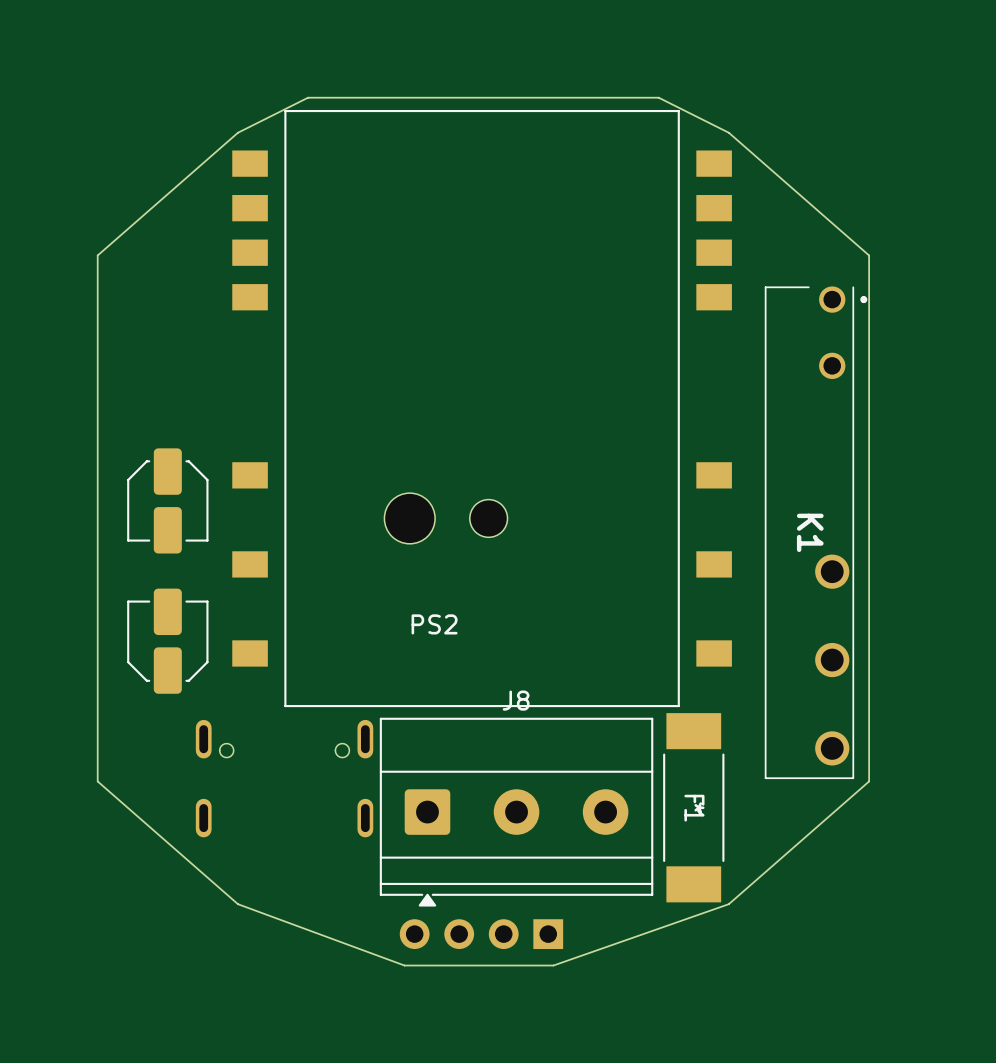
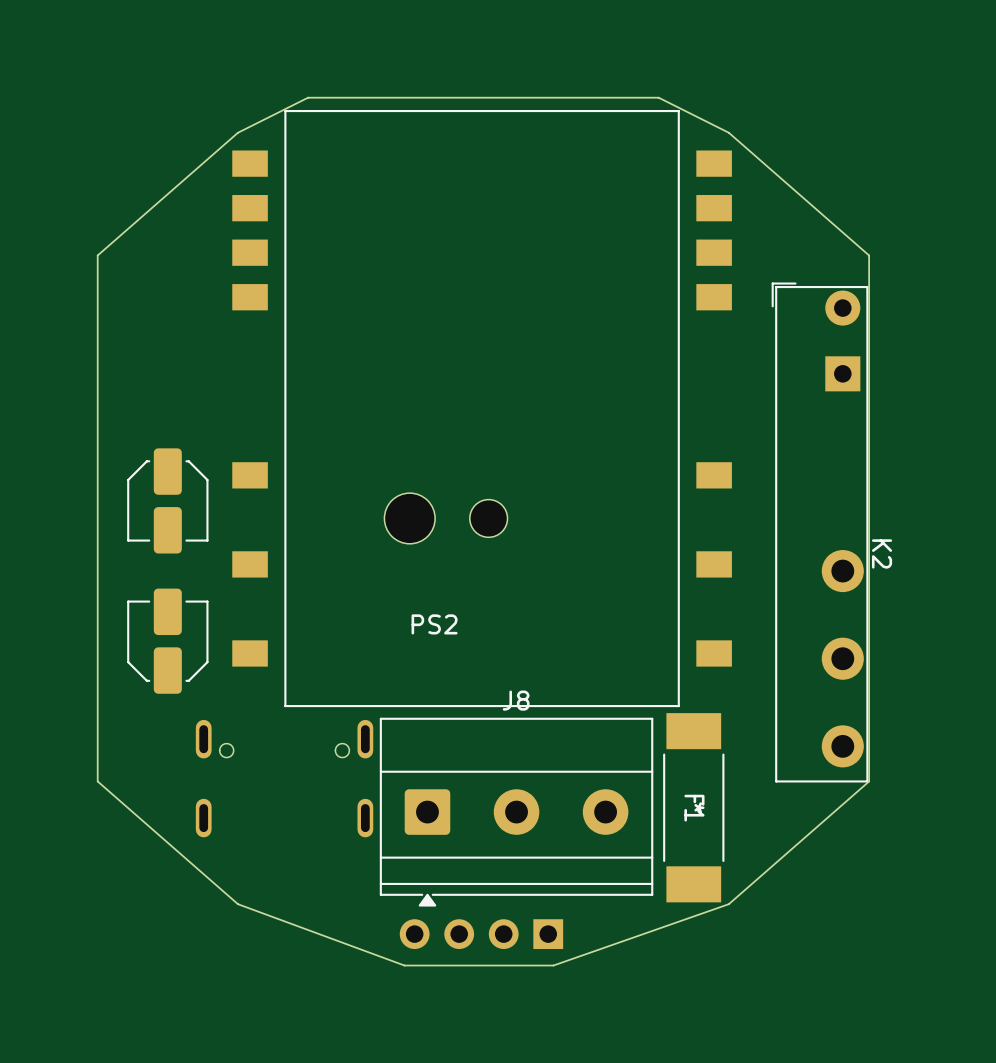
K1: (816, 532) -> none
K2: none -> (820, 532)

